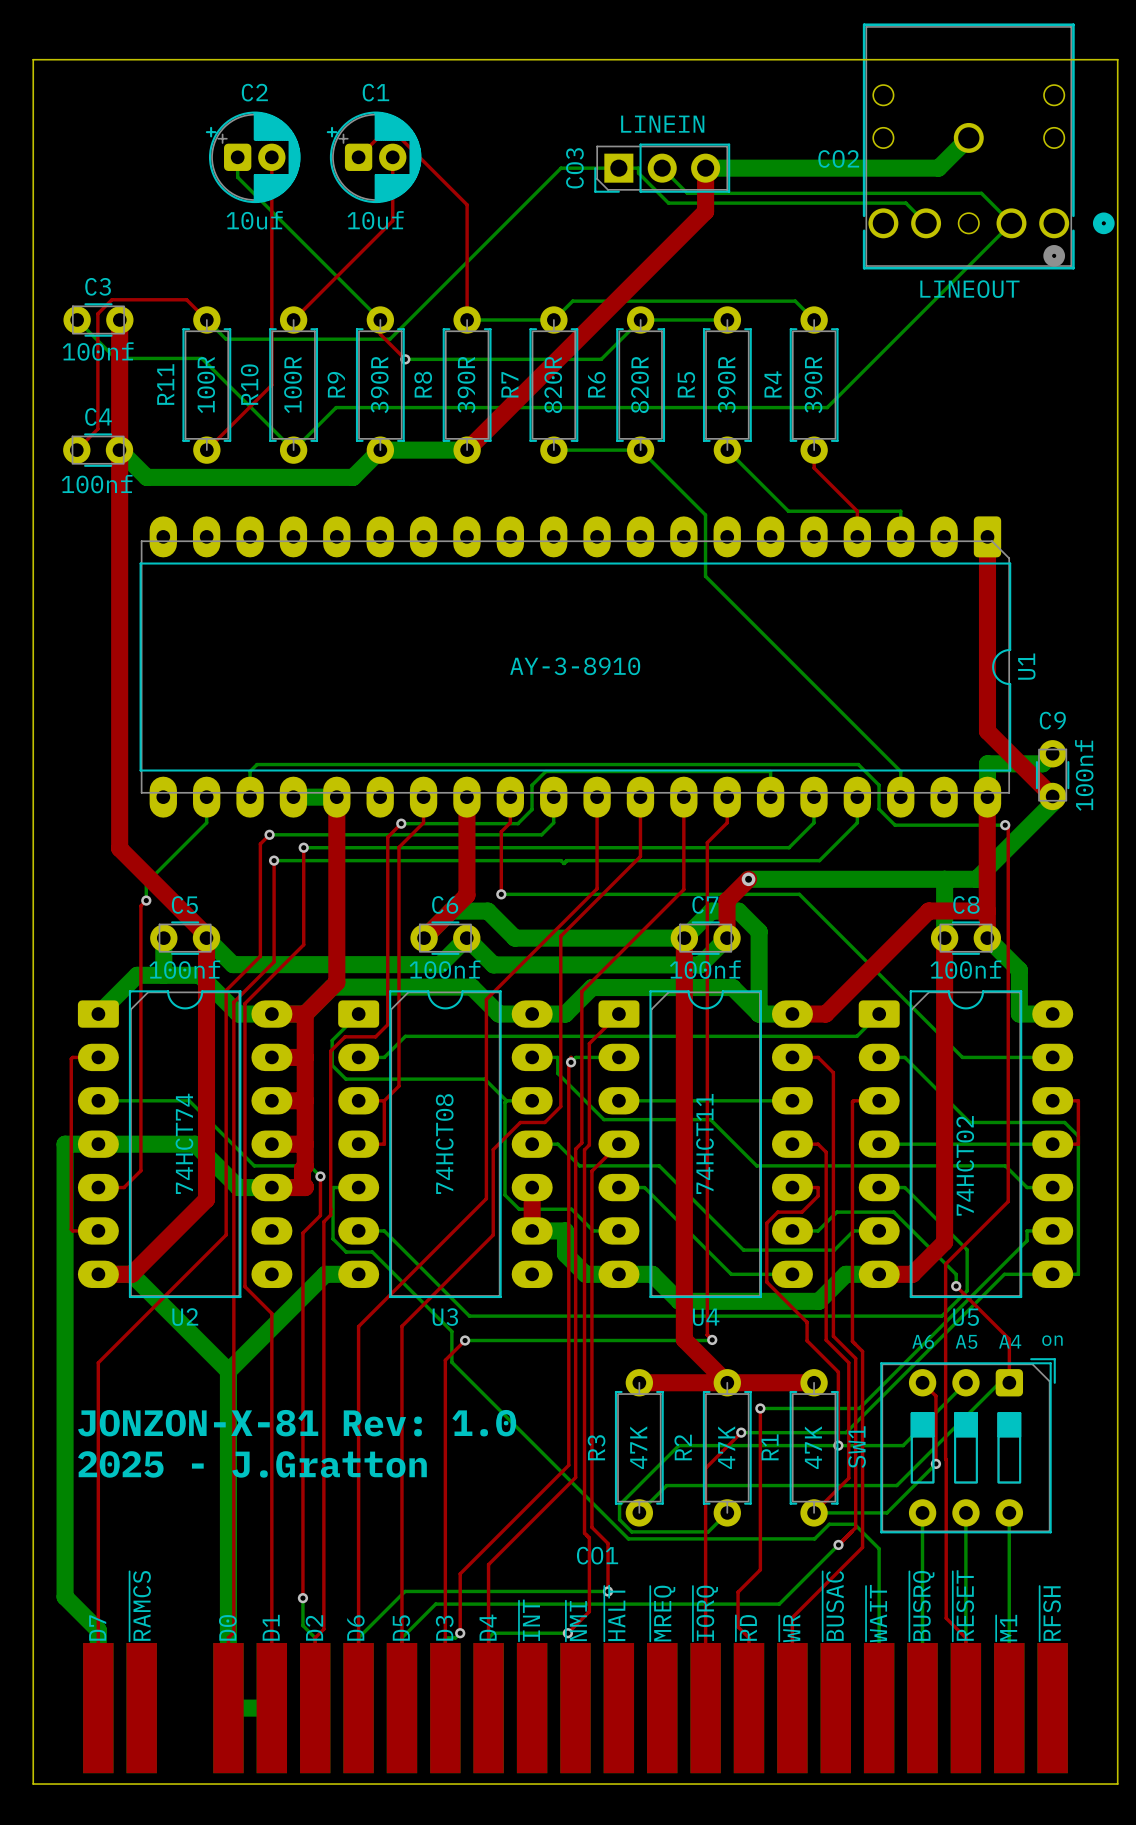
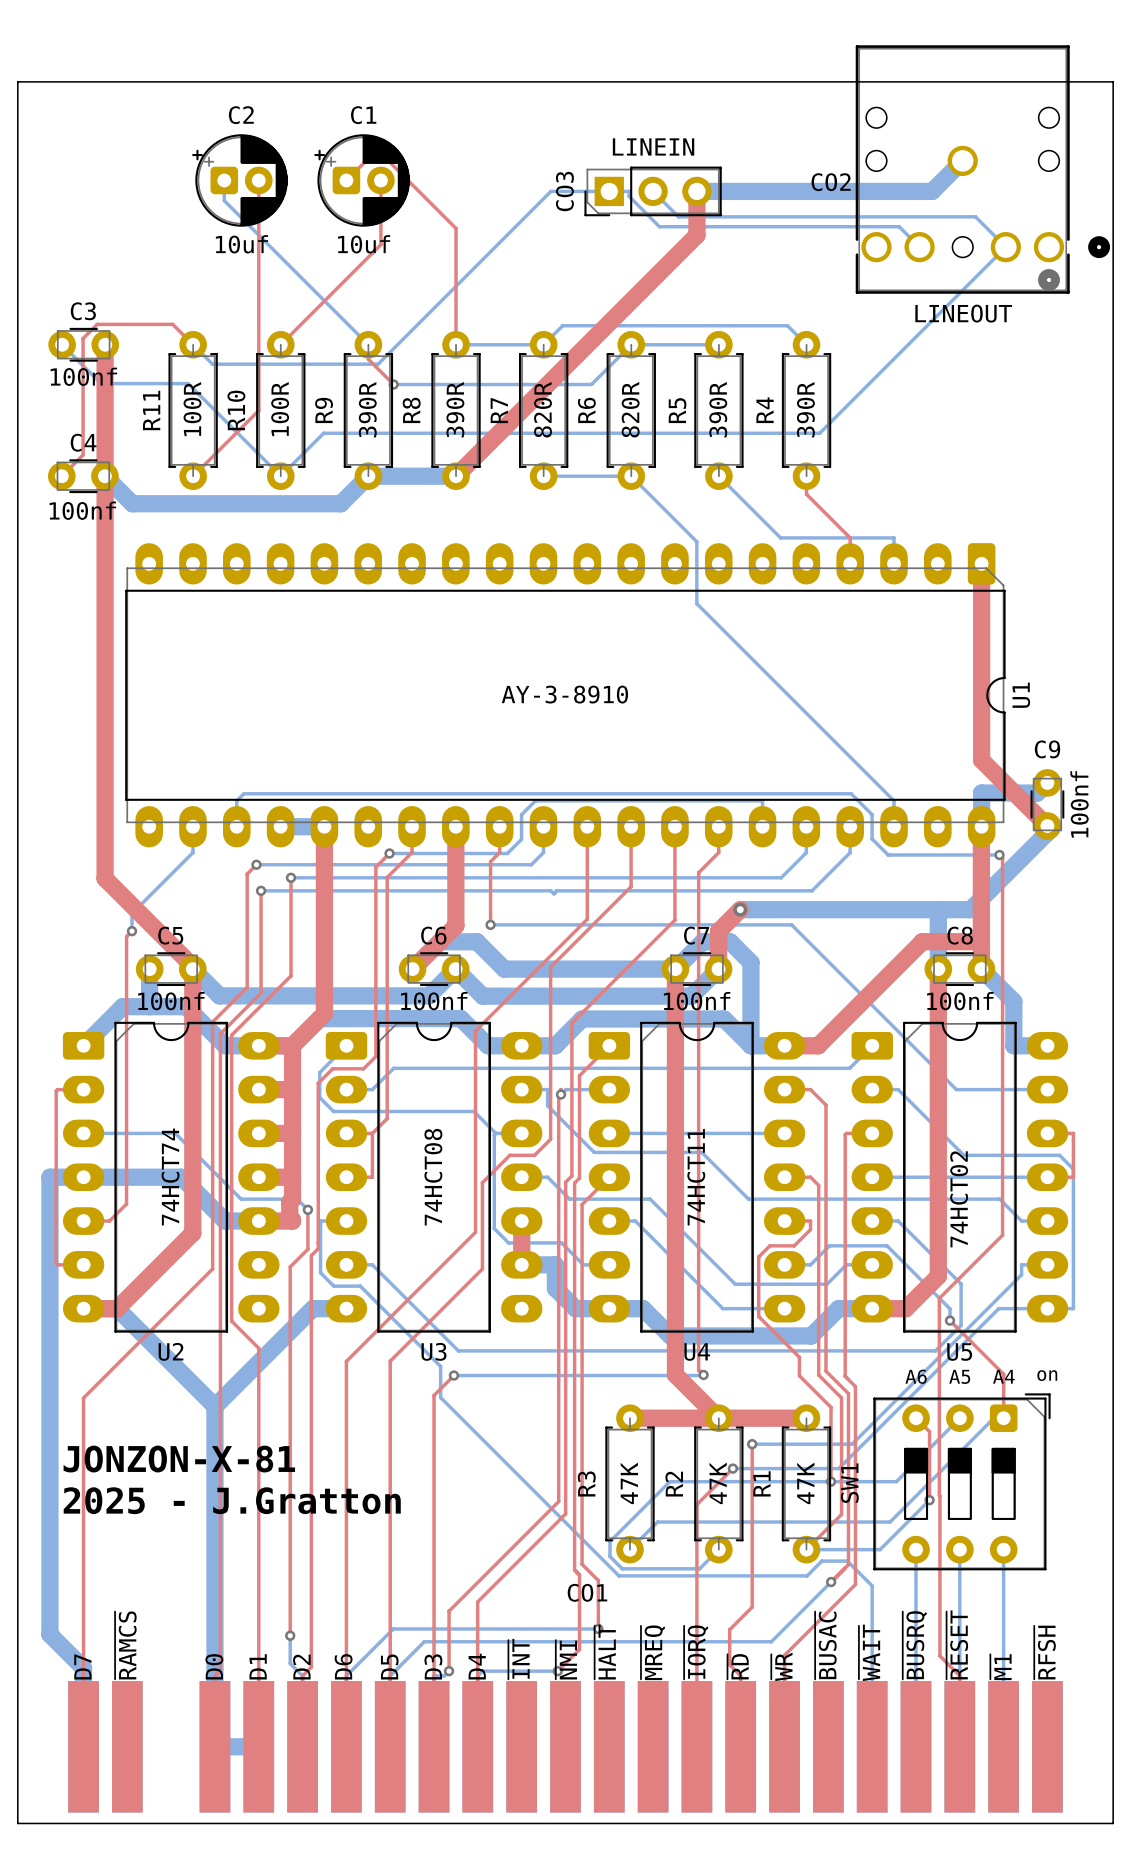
text: JONZON-X-81 Rev: 1.0 (297, 1423) -> JONZON-X-81 (179, 1459)

